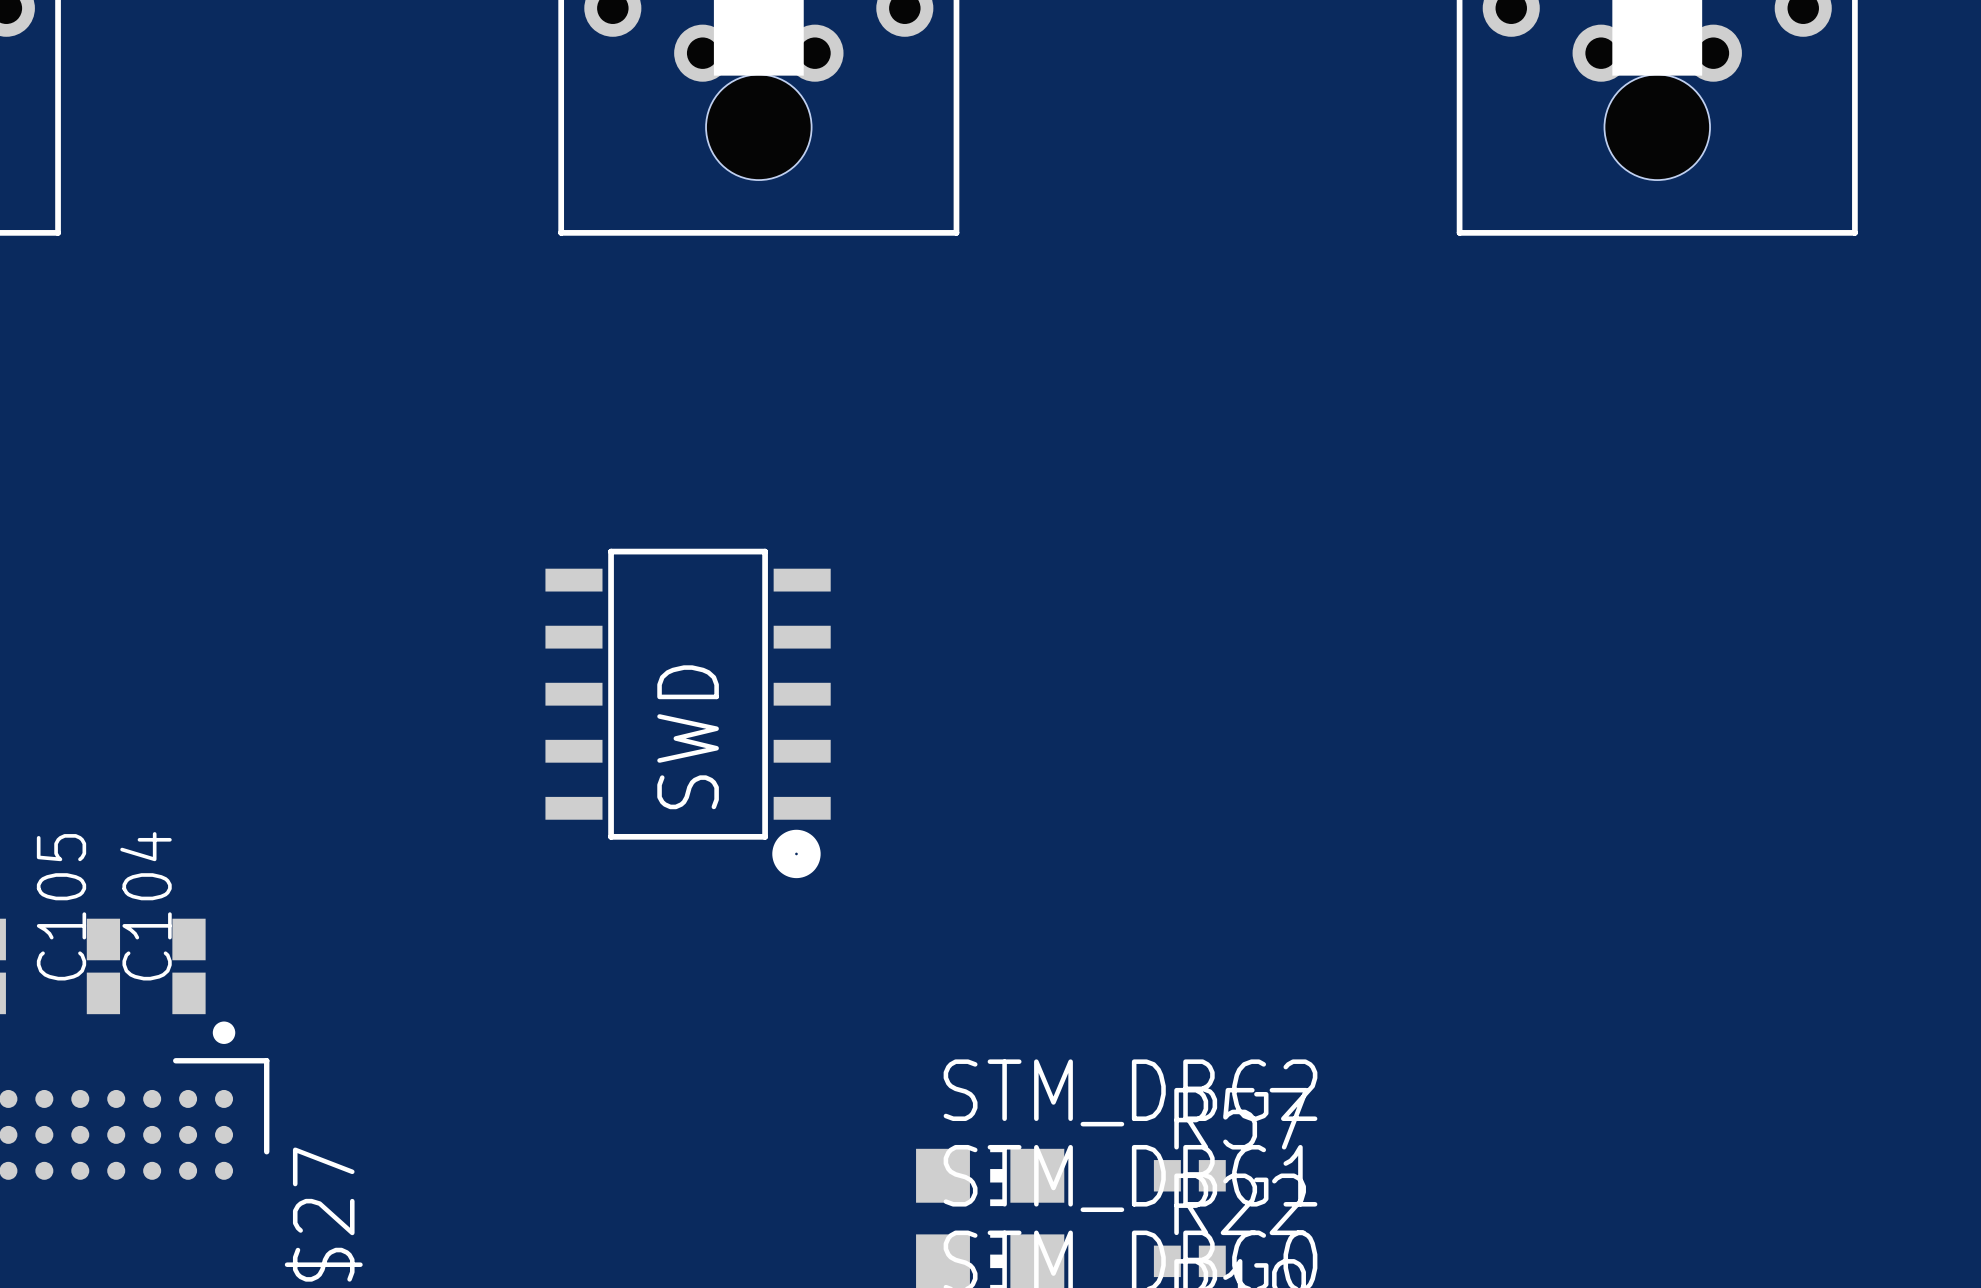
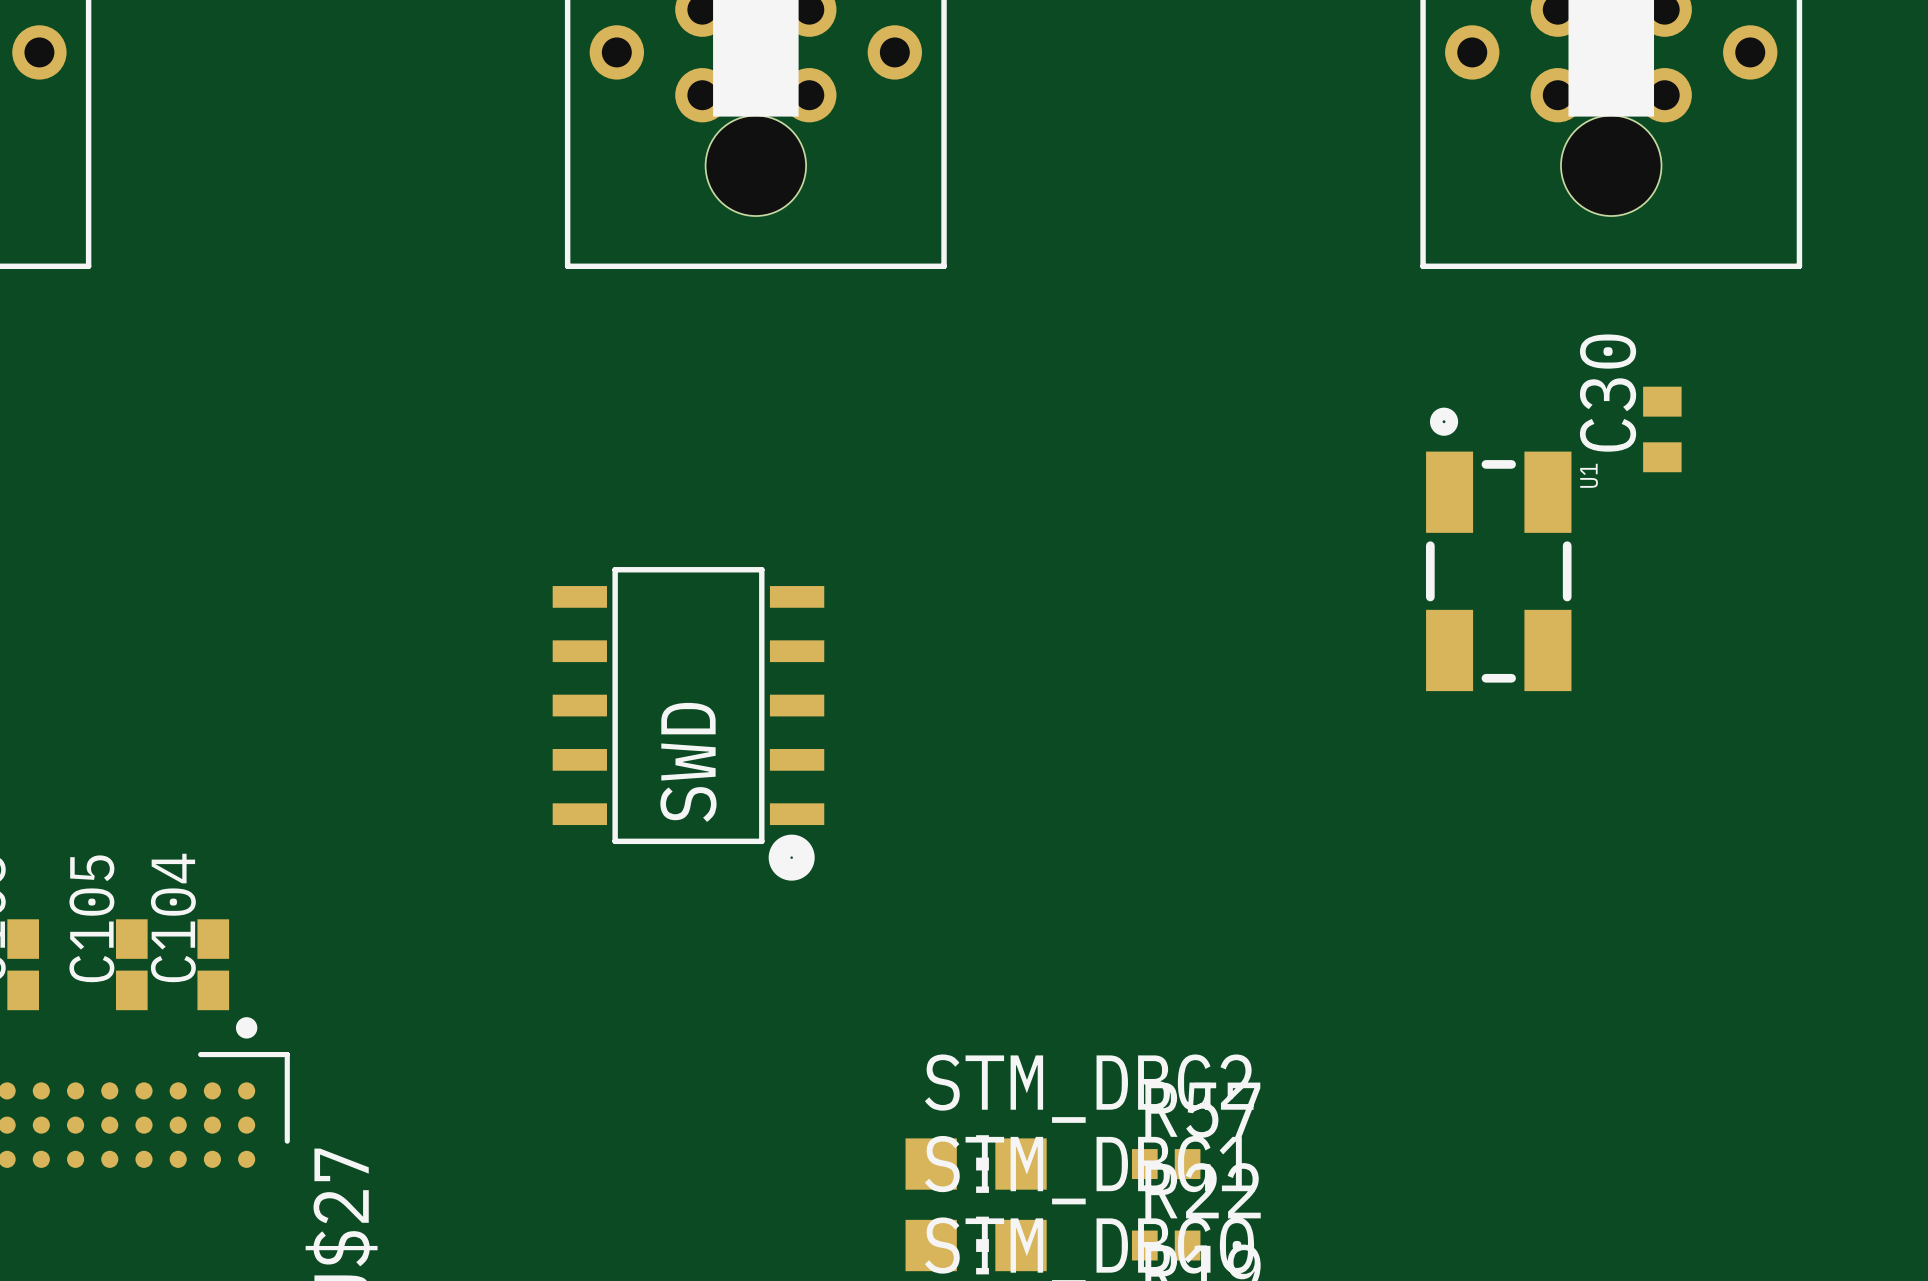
C30: none -> (1662, 429)
U1: none -> (1498, 549)

